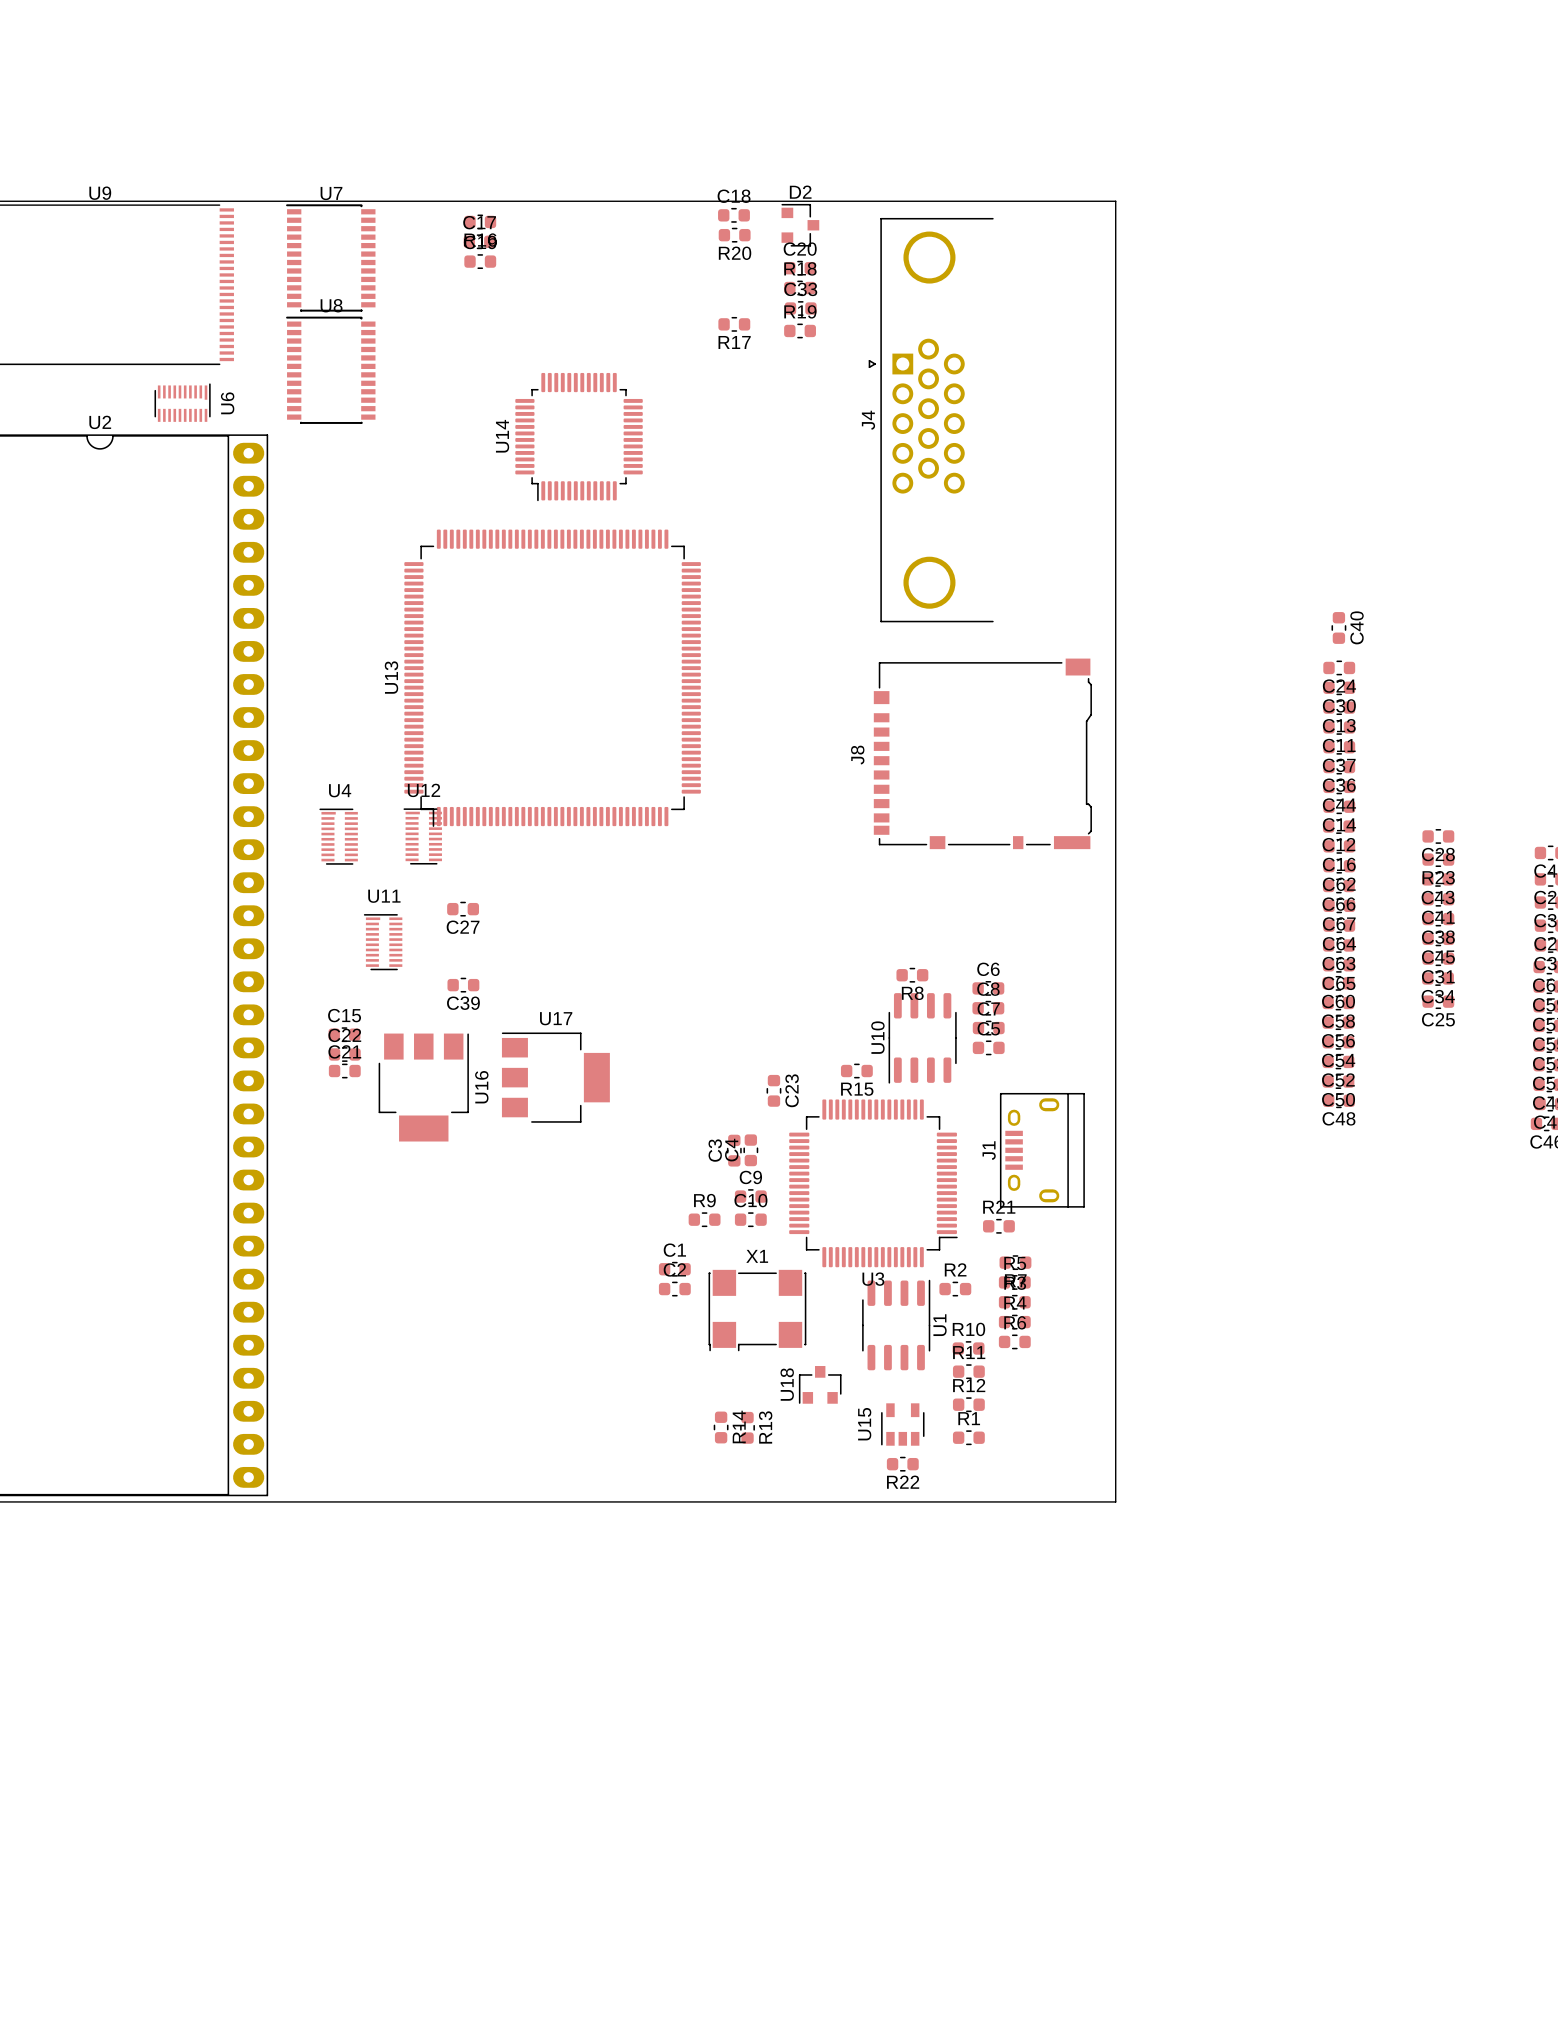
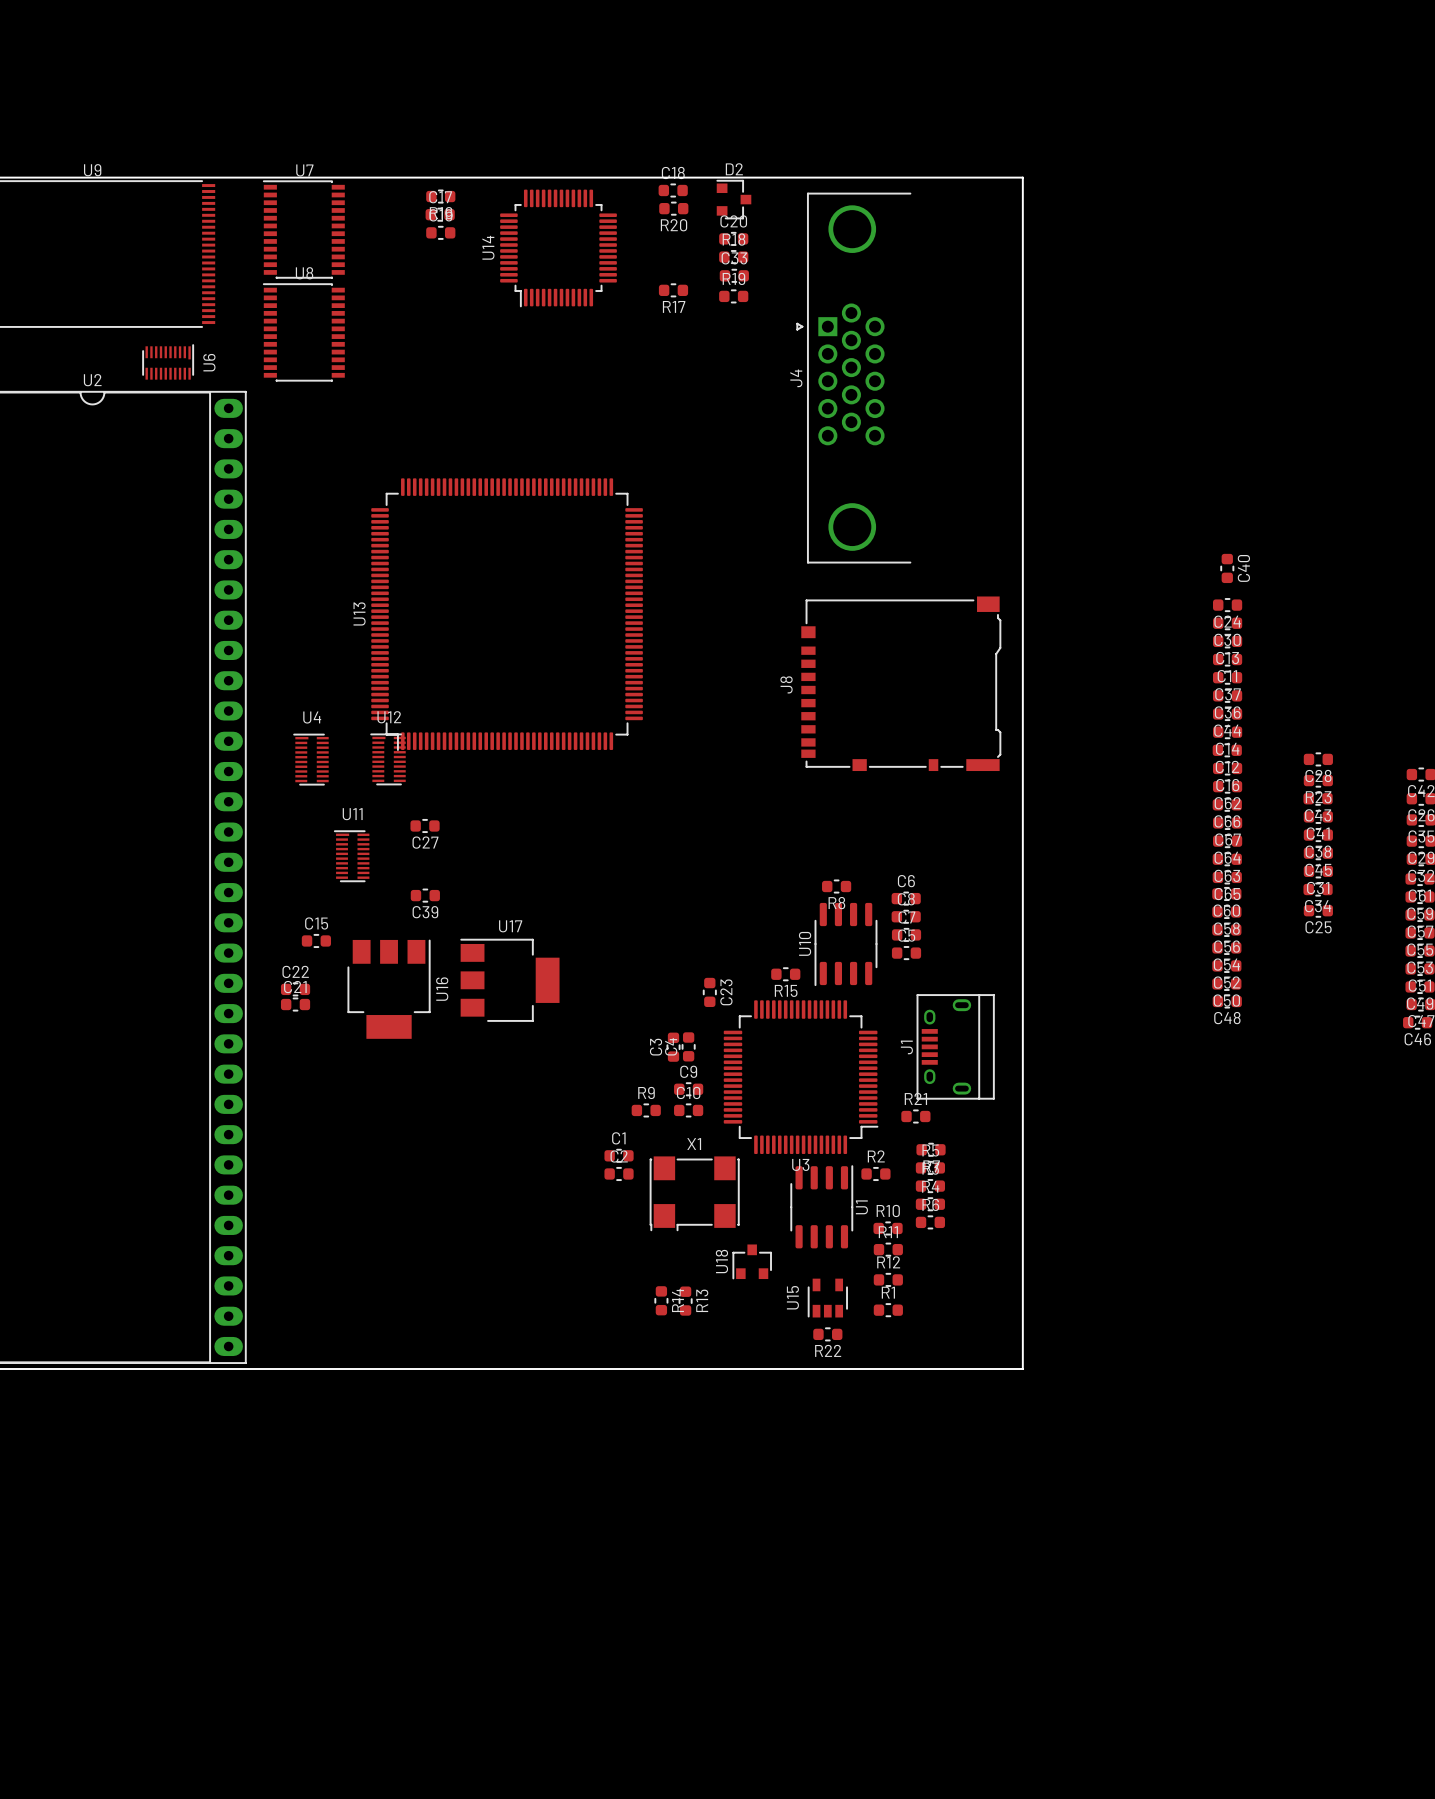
U14 position: (579, 437) -> (558, 248)
C22 position: (344, 1054) -> (295, 989)
C21 position: (344, 1071) -> (295, 1004)

